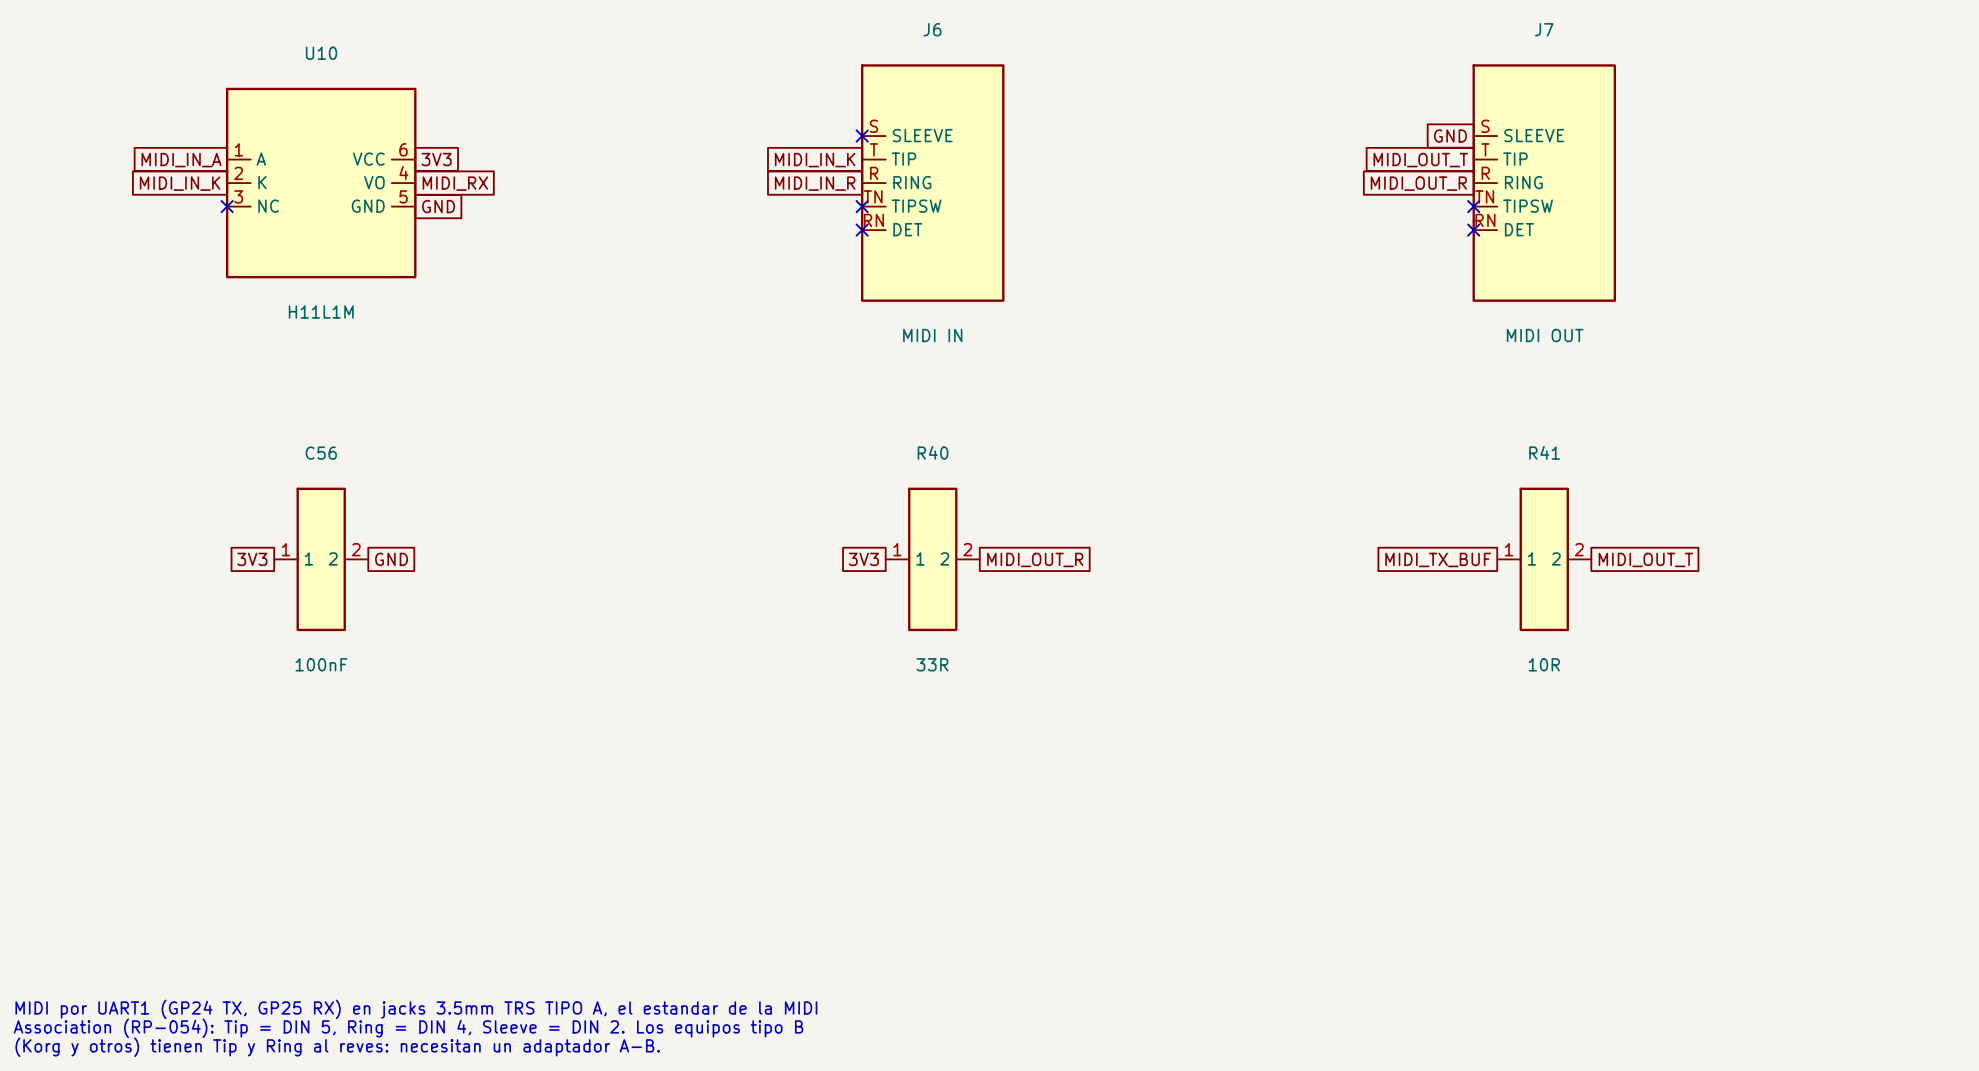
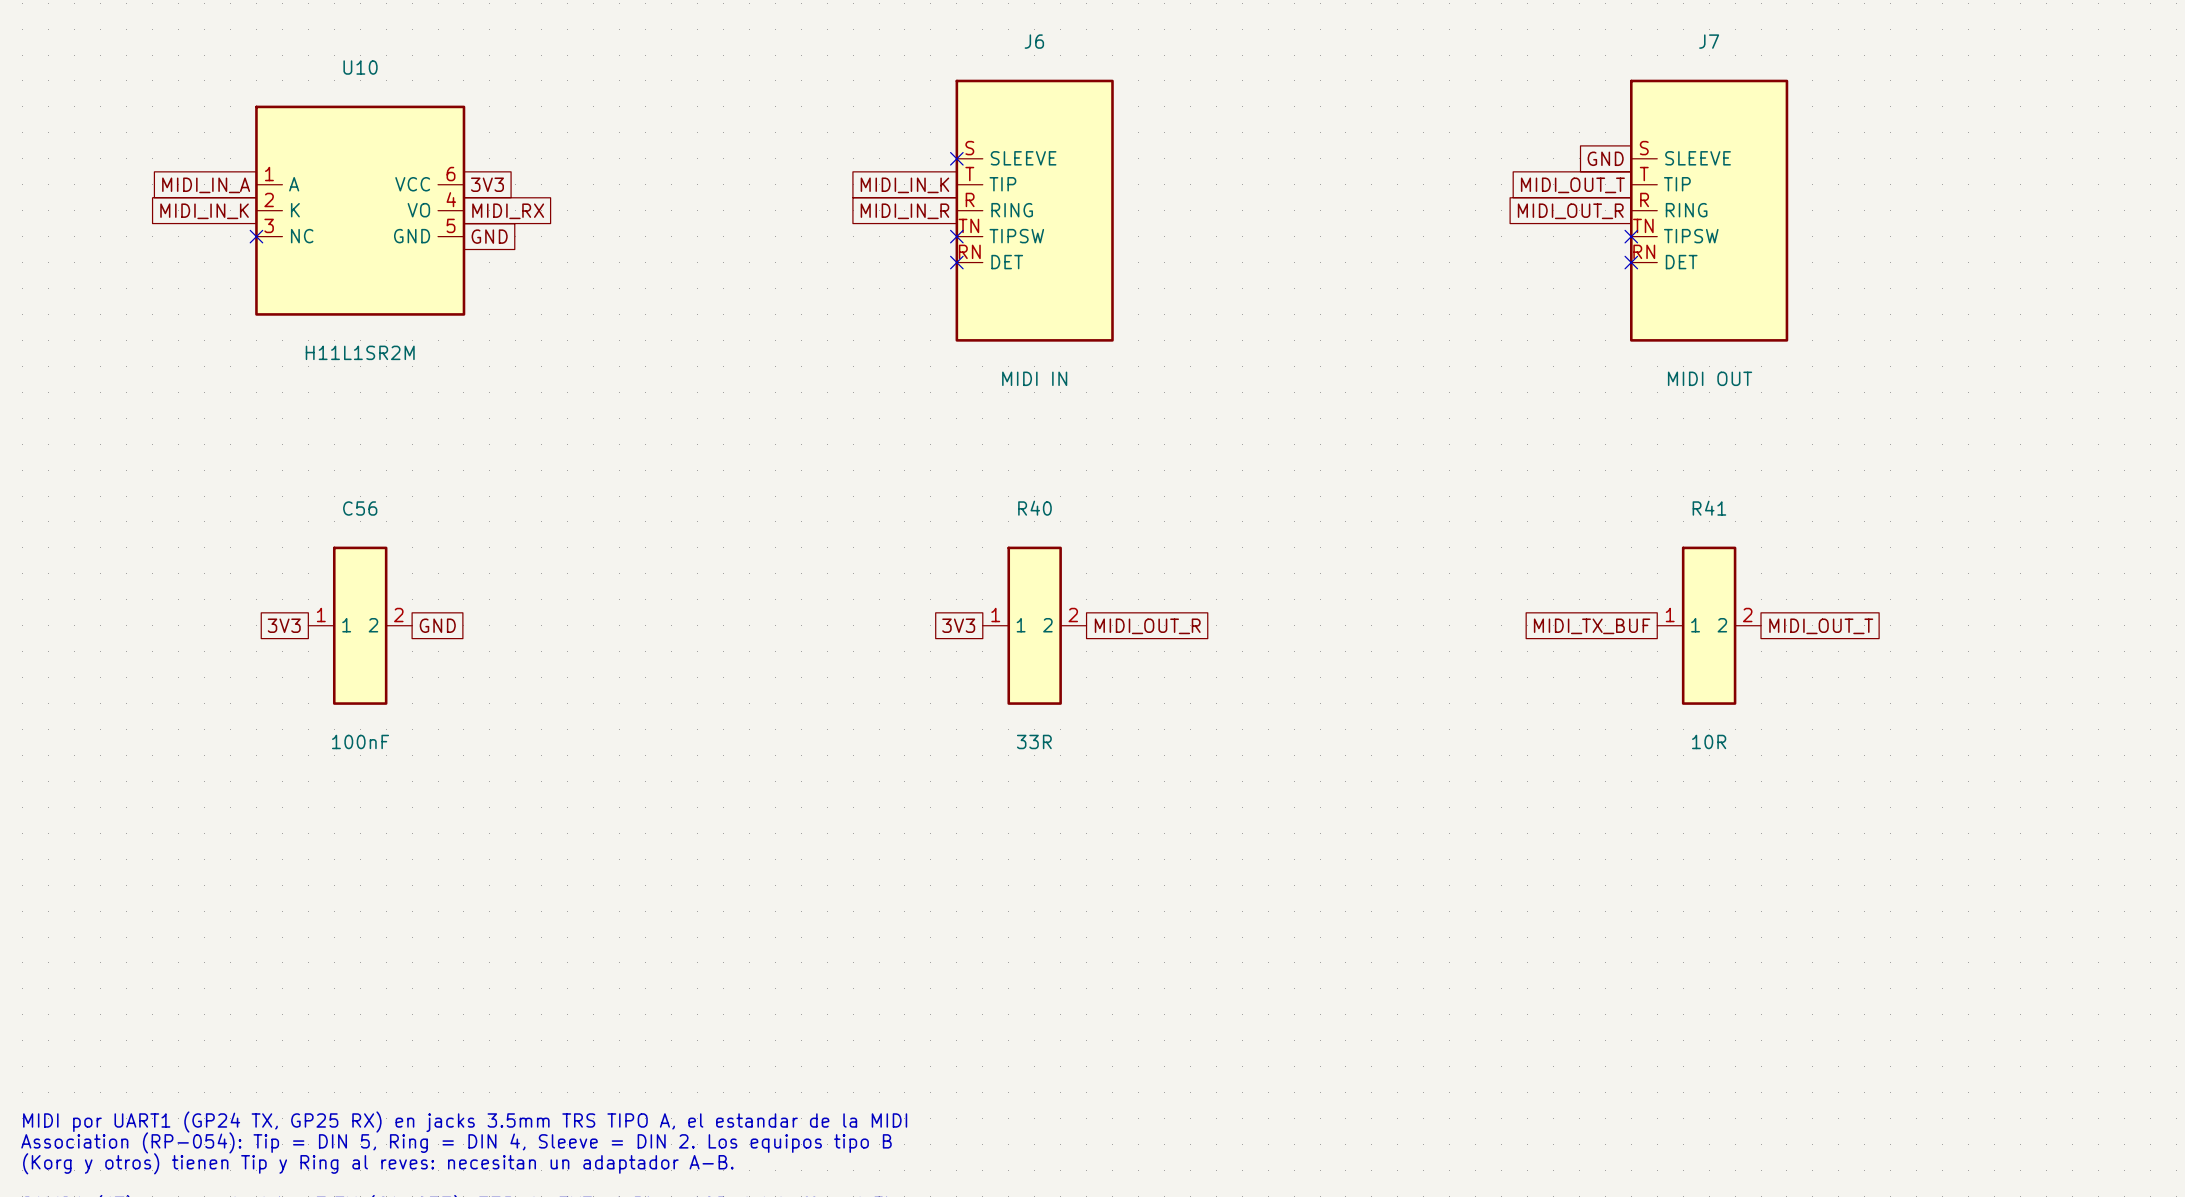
U10 value: H11L1M (321, 311) -> H11L1SR2M (360, 352)

